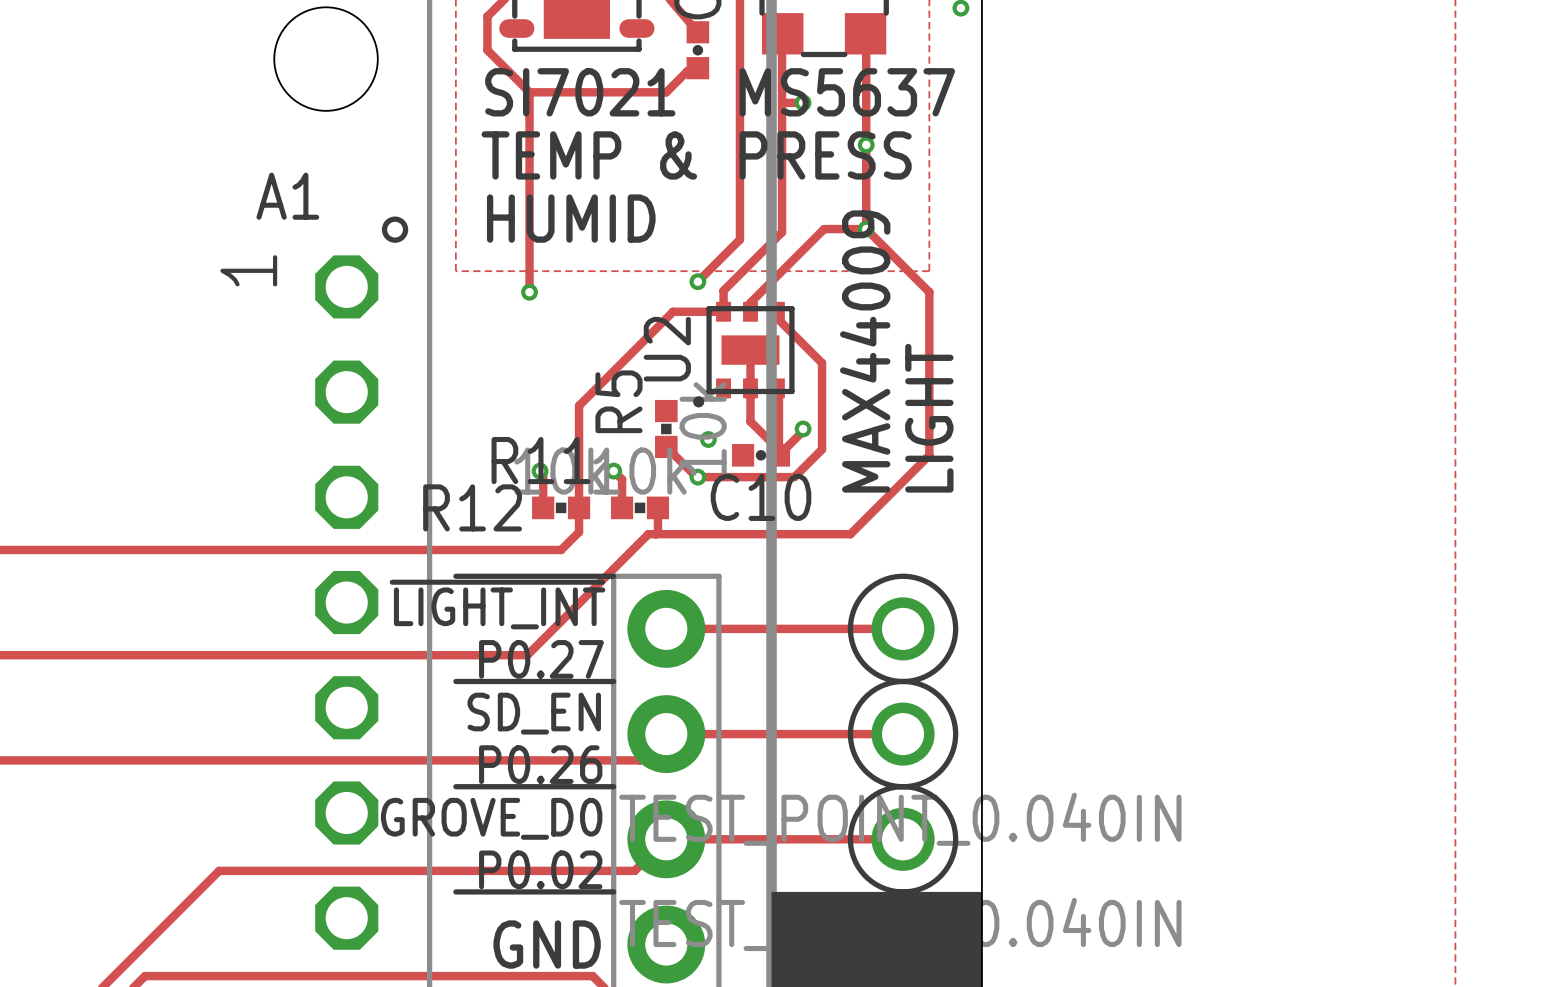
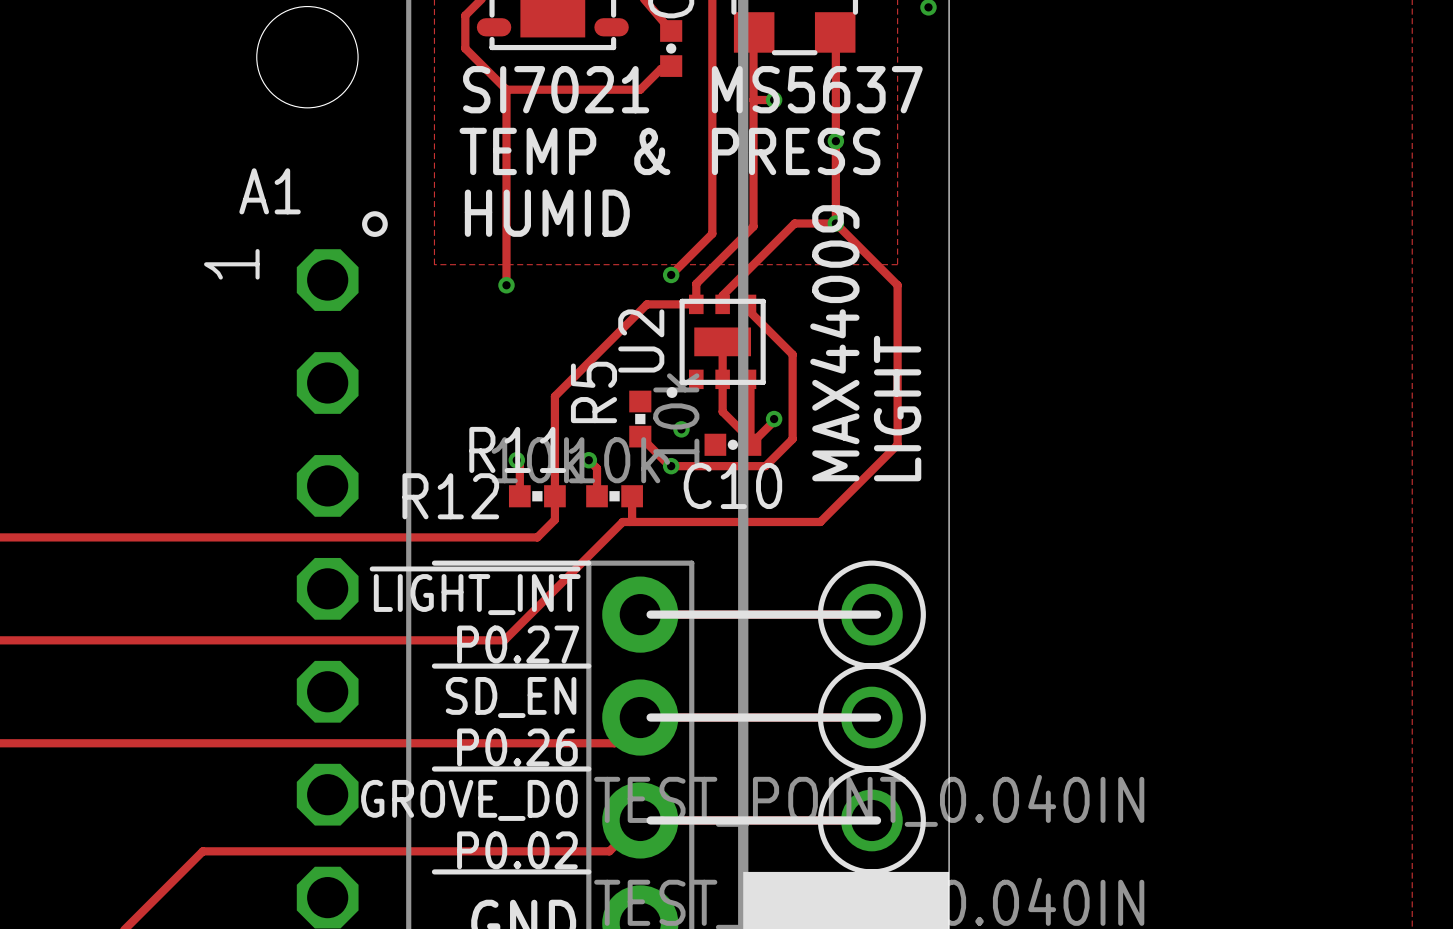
line: none -> (650, 614) (877, 614)
line: none -> (650, 717) (877, 717)
line: none -> (650, 820) (877, 820)

